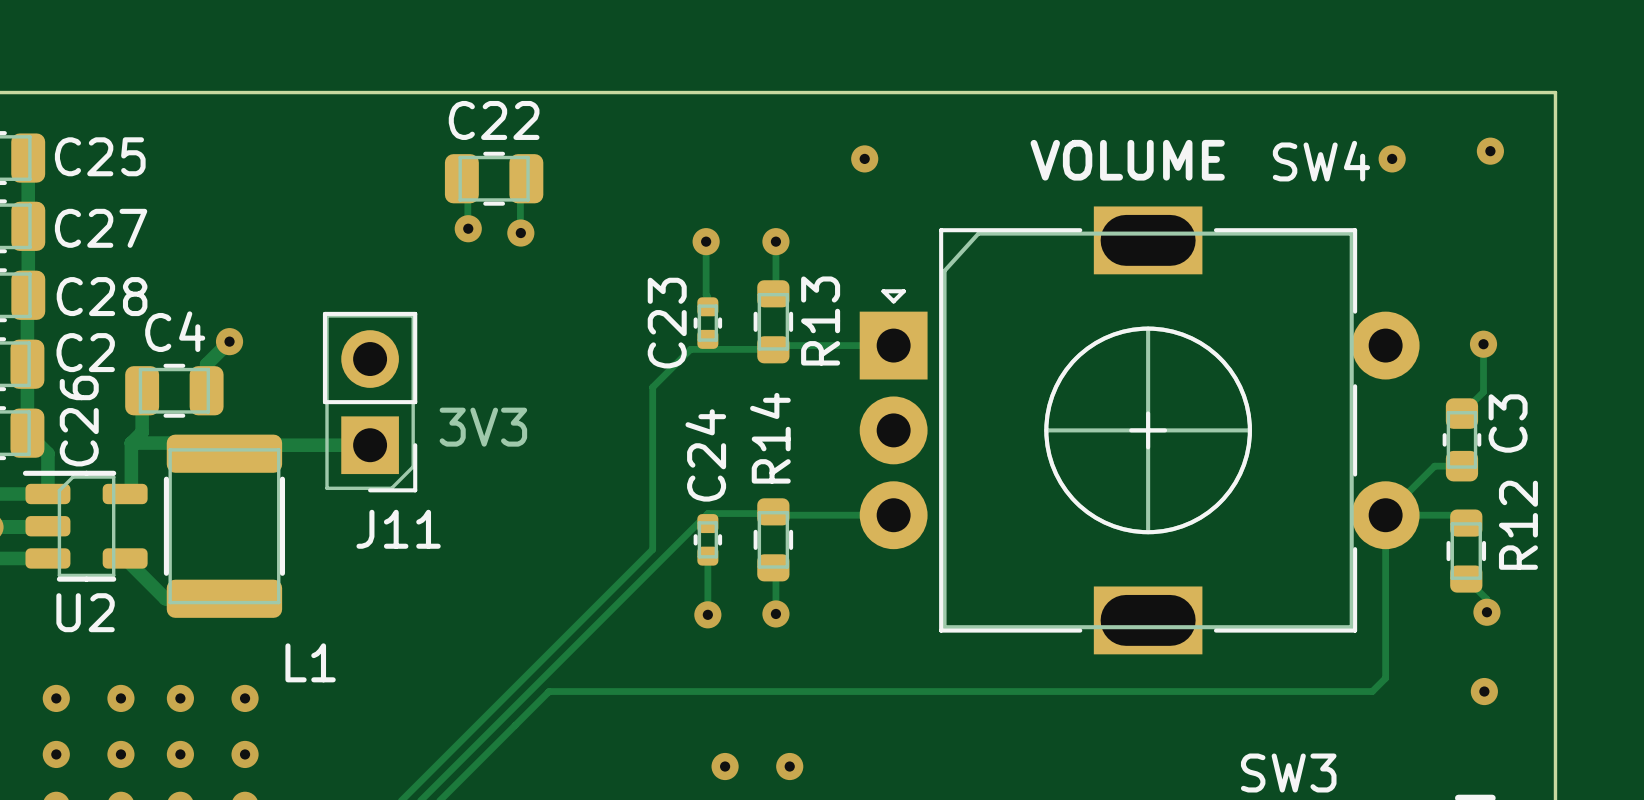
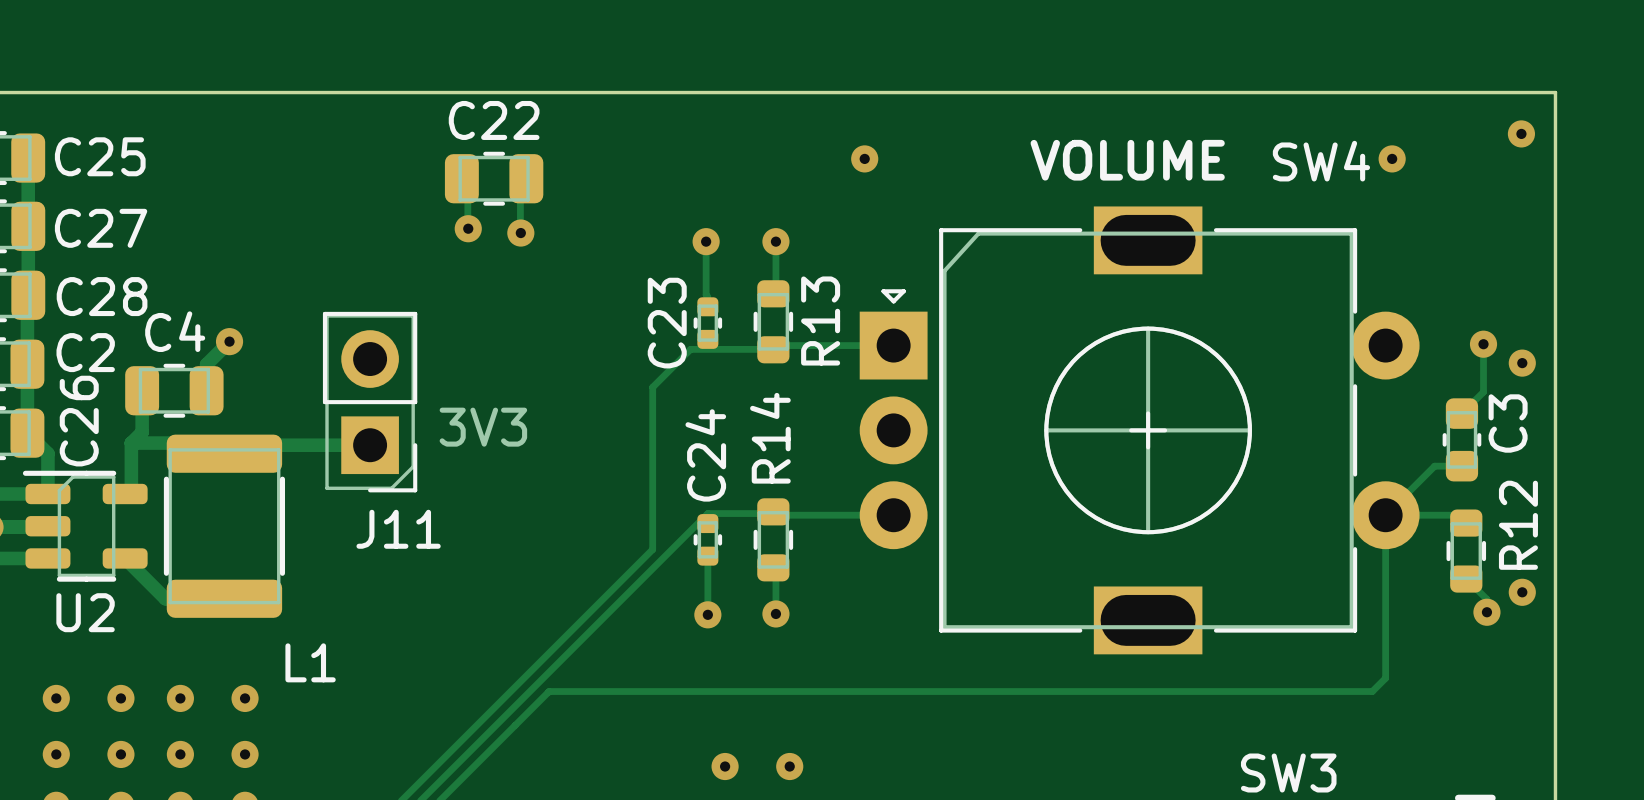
via position: (1490, 151) -> (1521, 133)
via: none -> (1522, 363)
via: none -> (1522, 592)
via: (1484, 691) -> none

